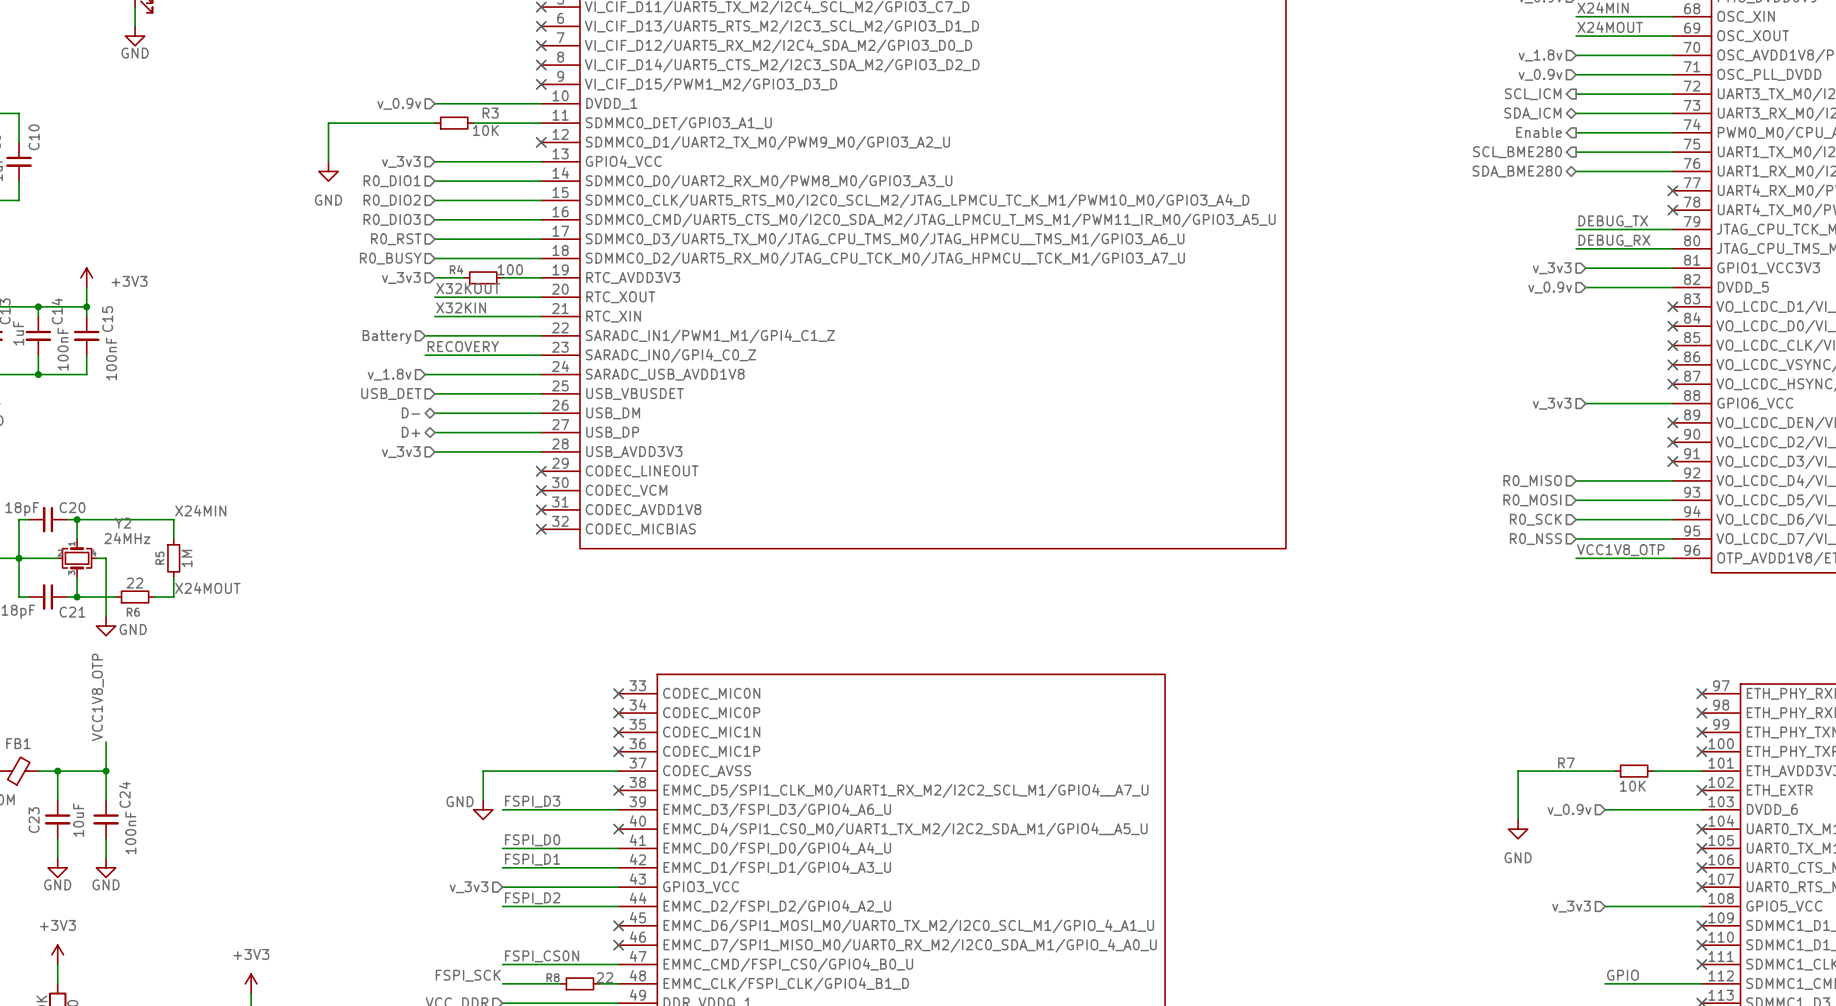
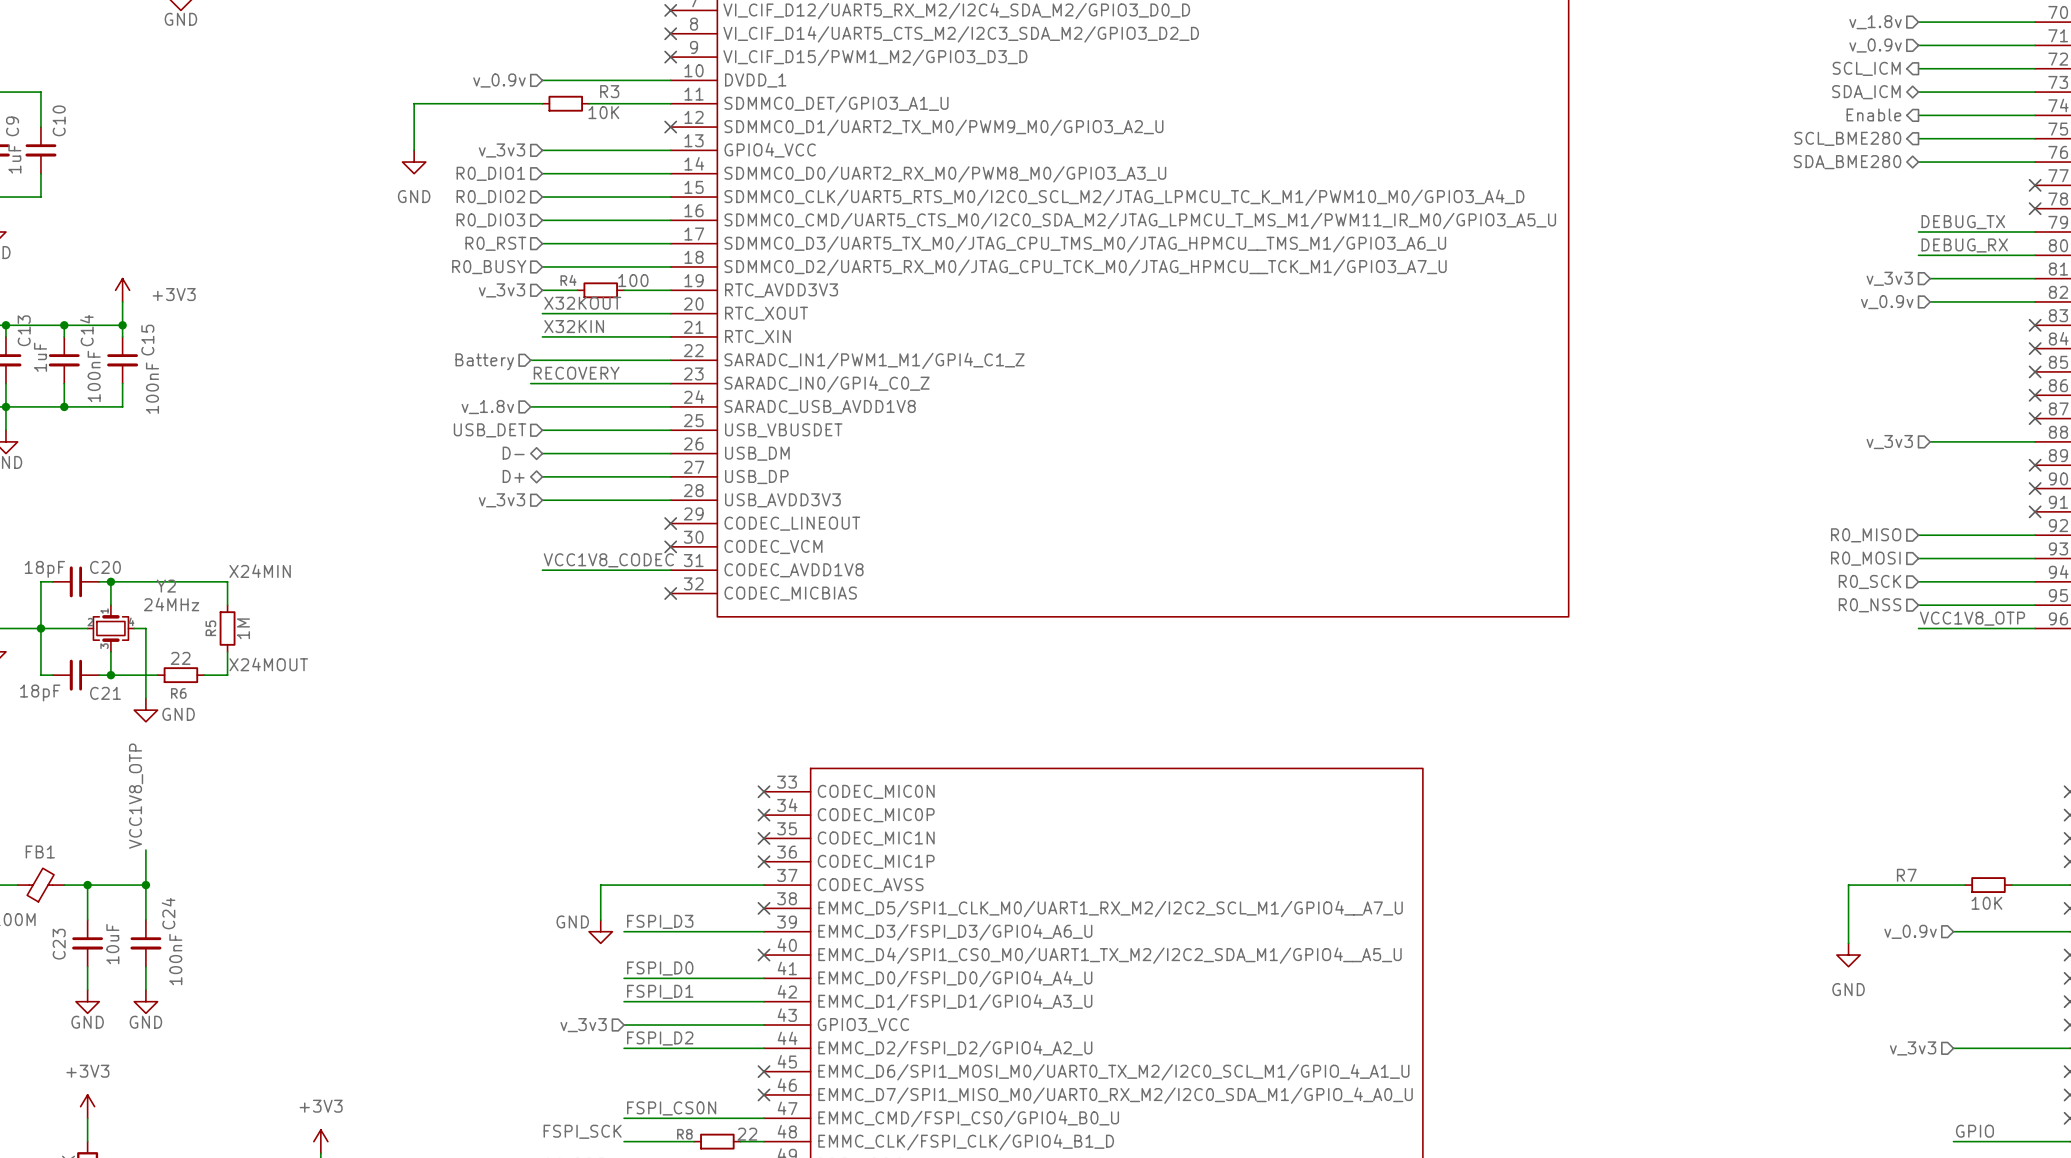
label: none -> VCC1V8_CODEC (608, 560)
wire: none -> (542, 570) (670, 570)
no-connect mark: (541, 509) -> none

